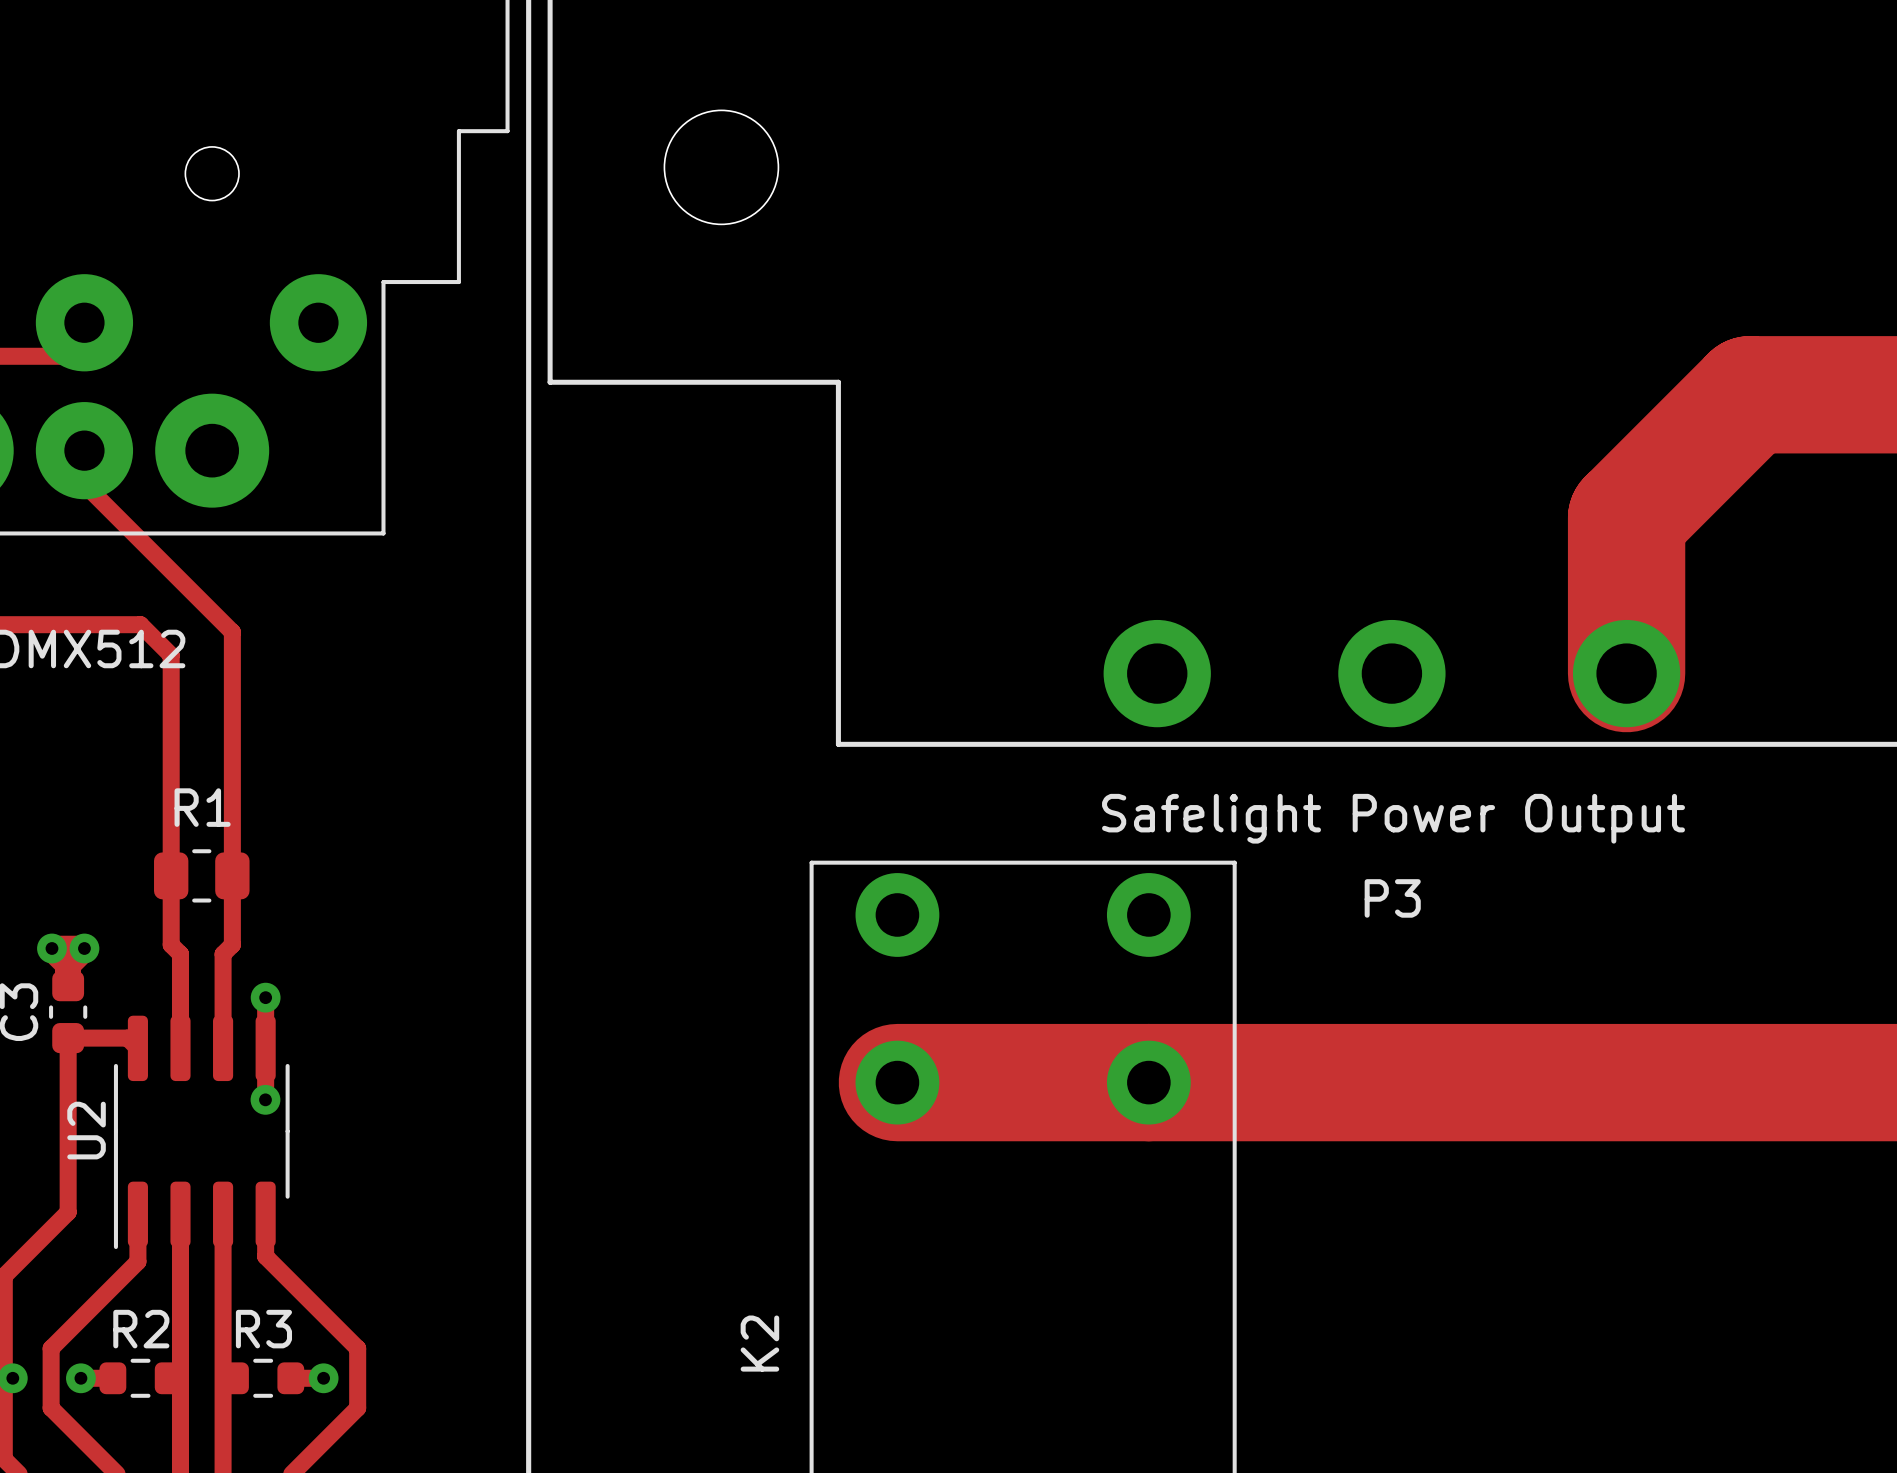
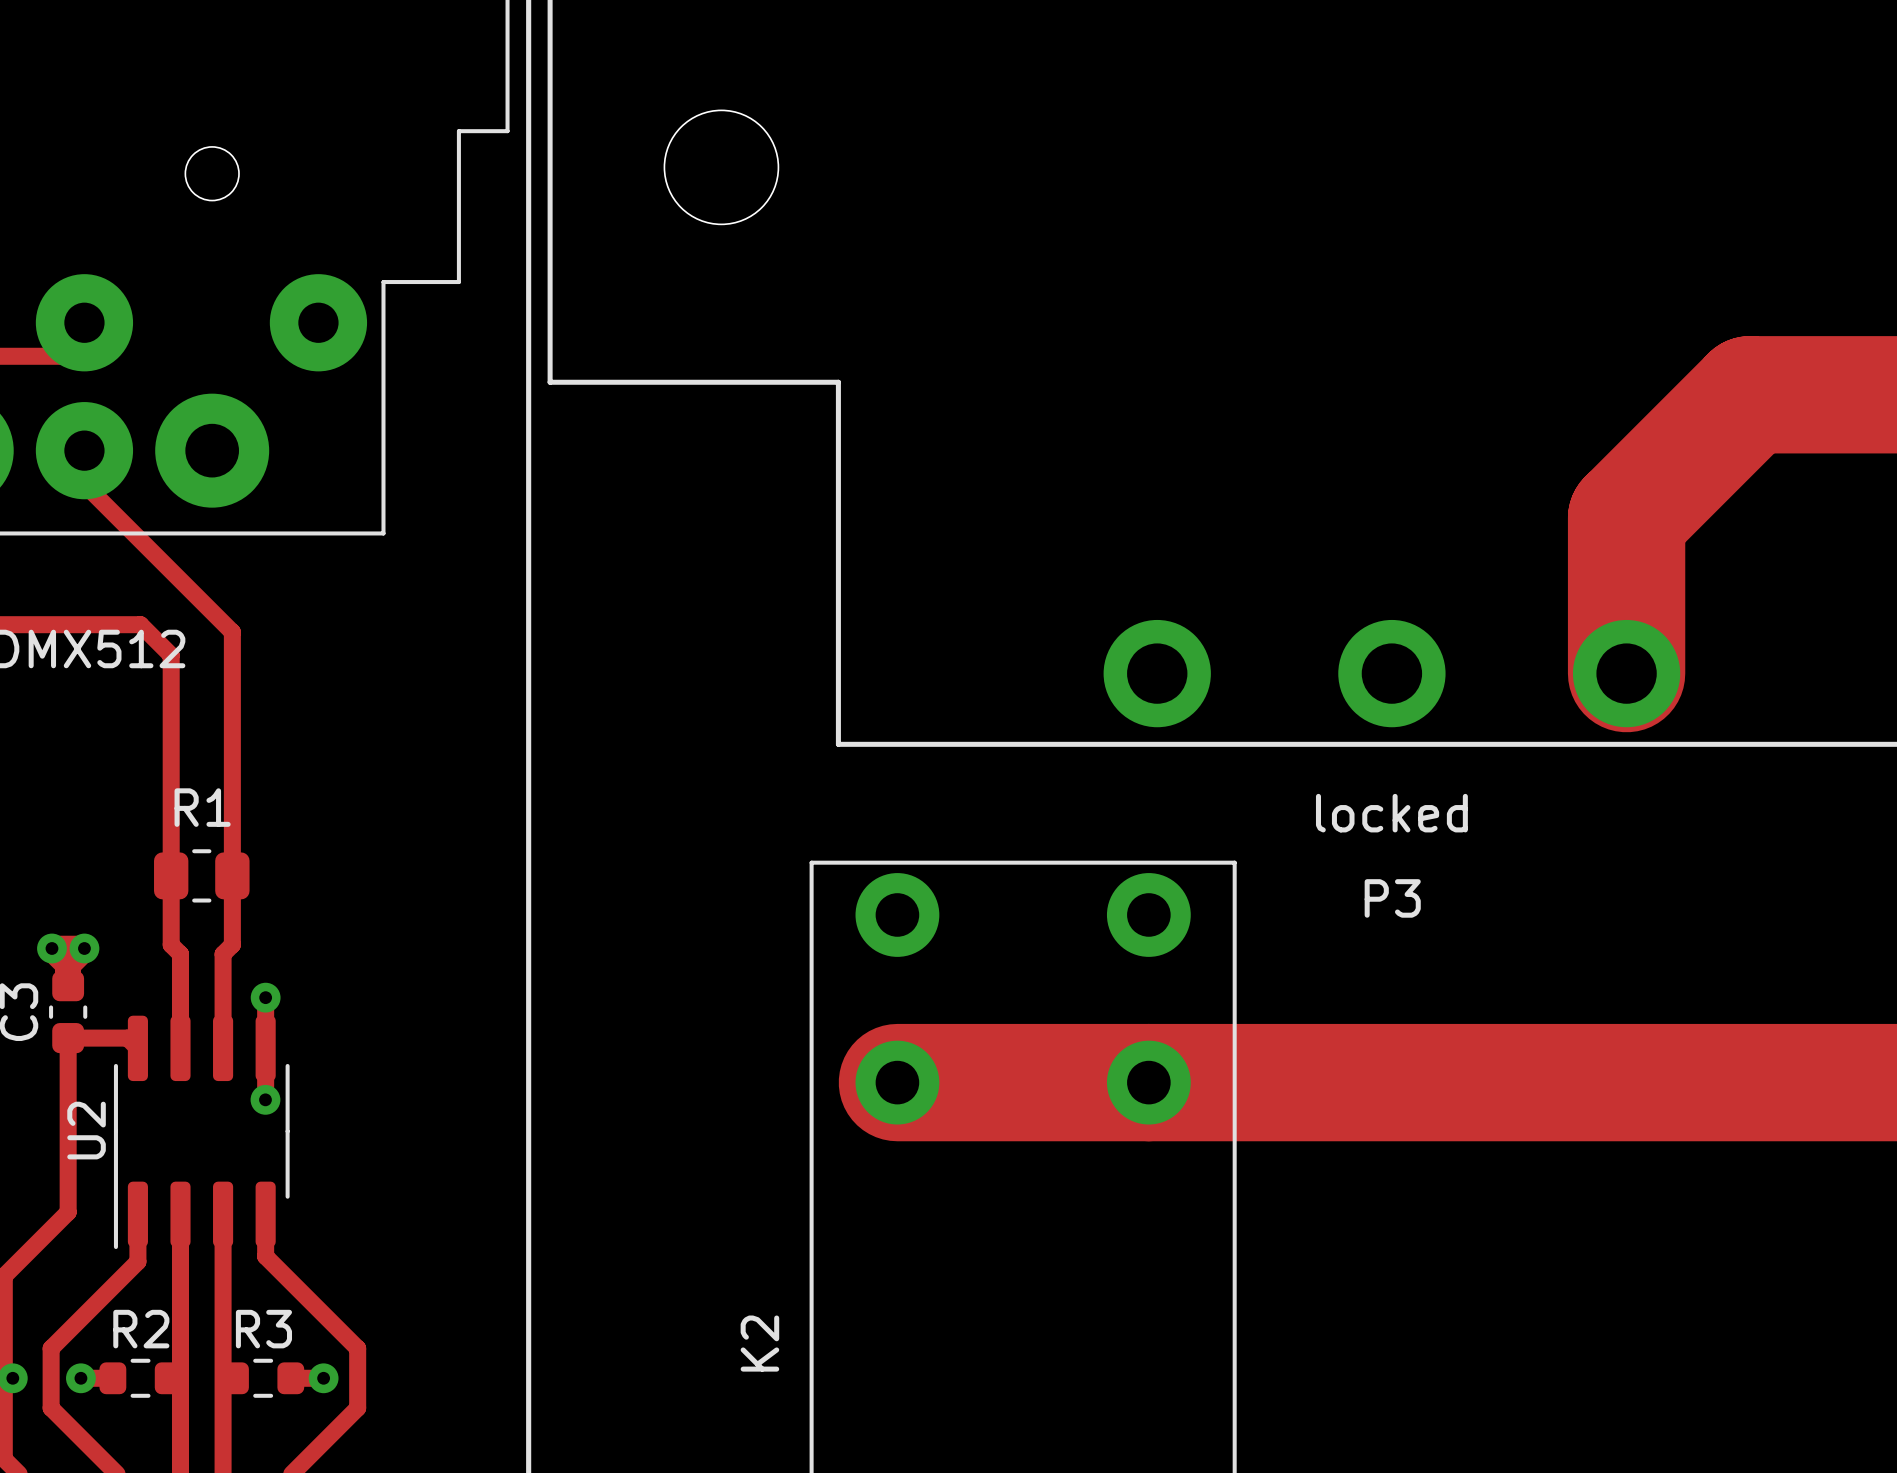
text: Safelight Power Output (1393, 818) -> locked (1391, 813)

